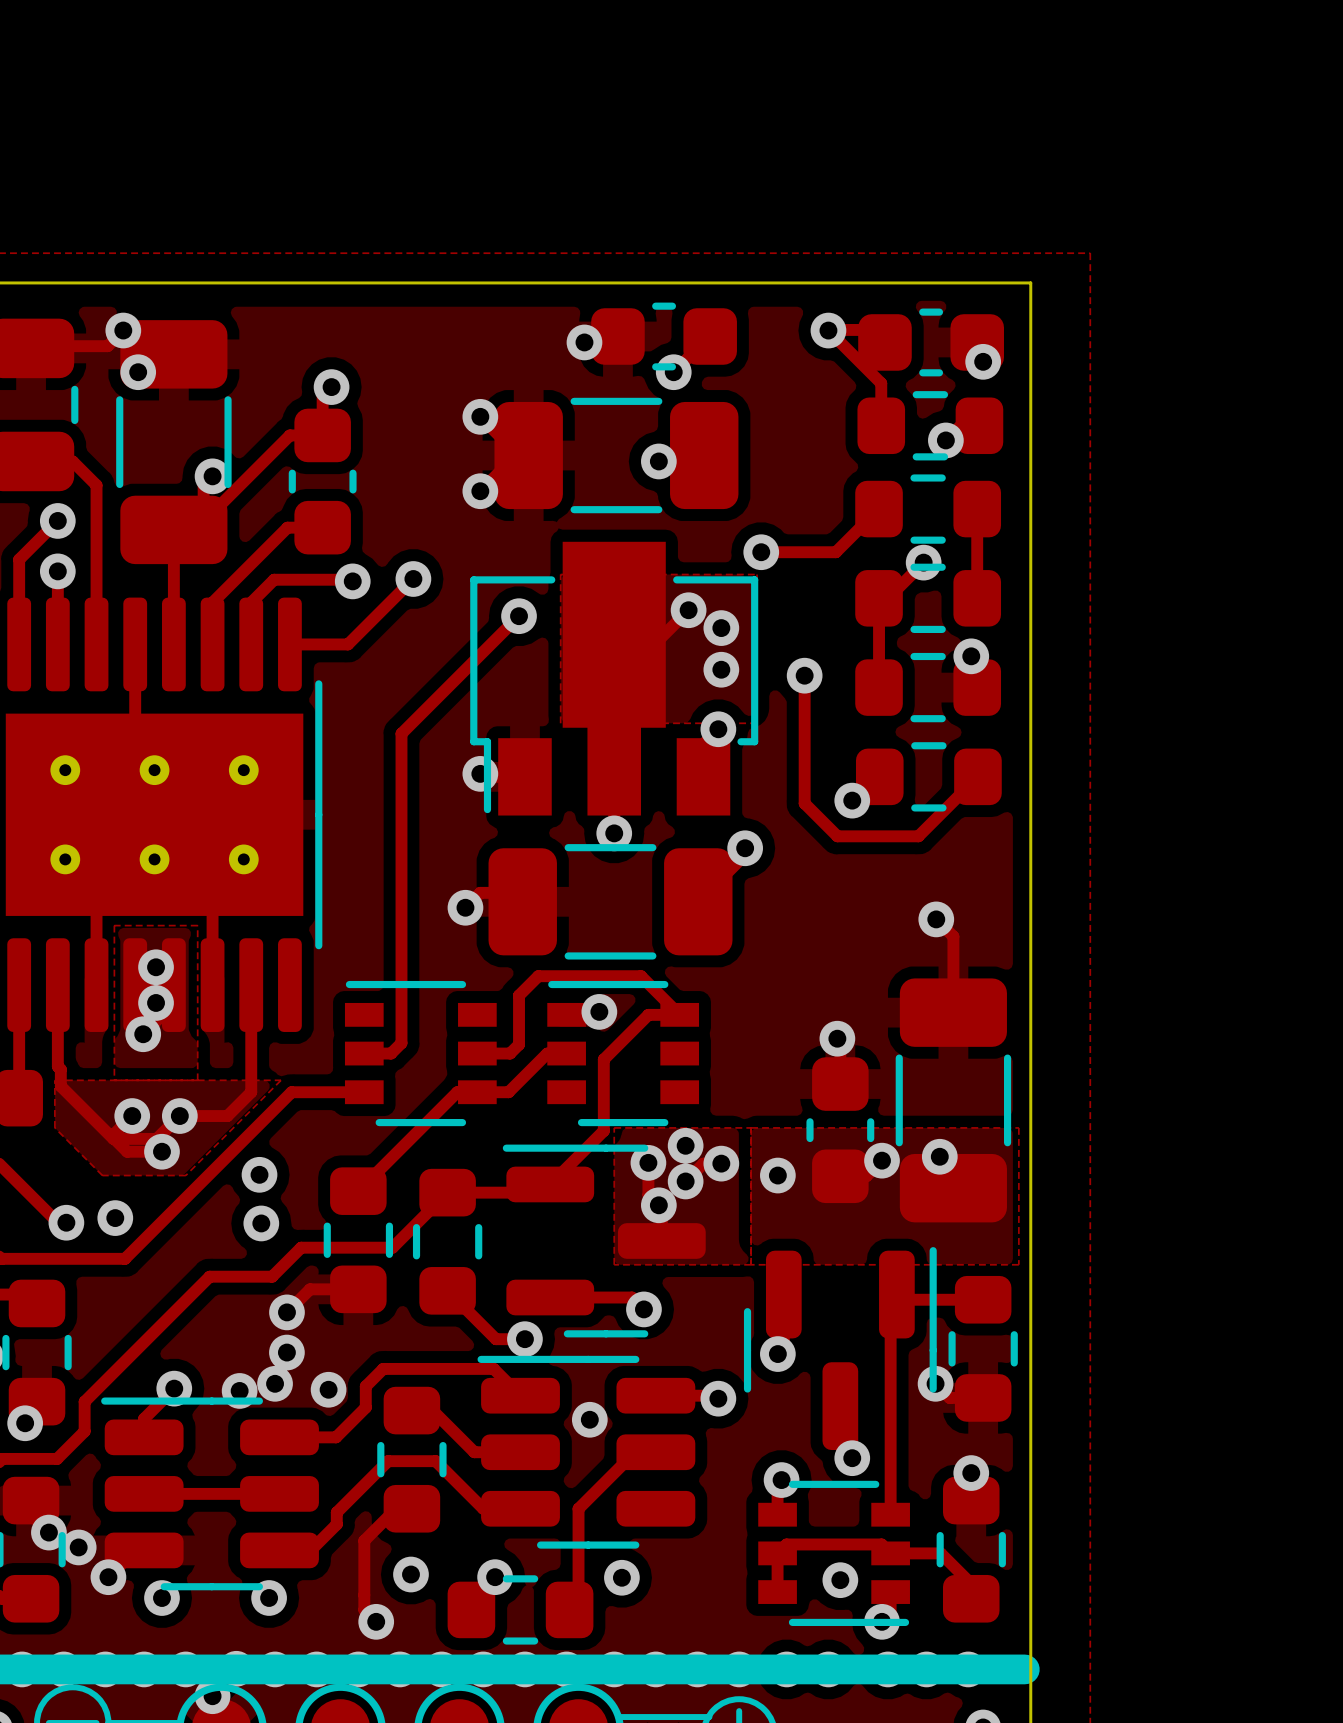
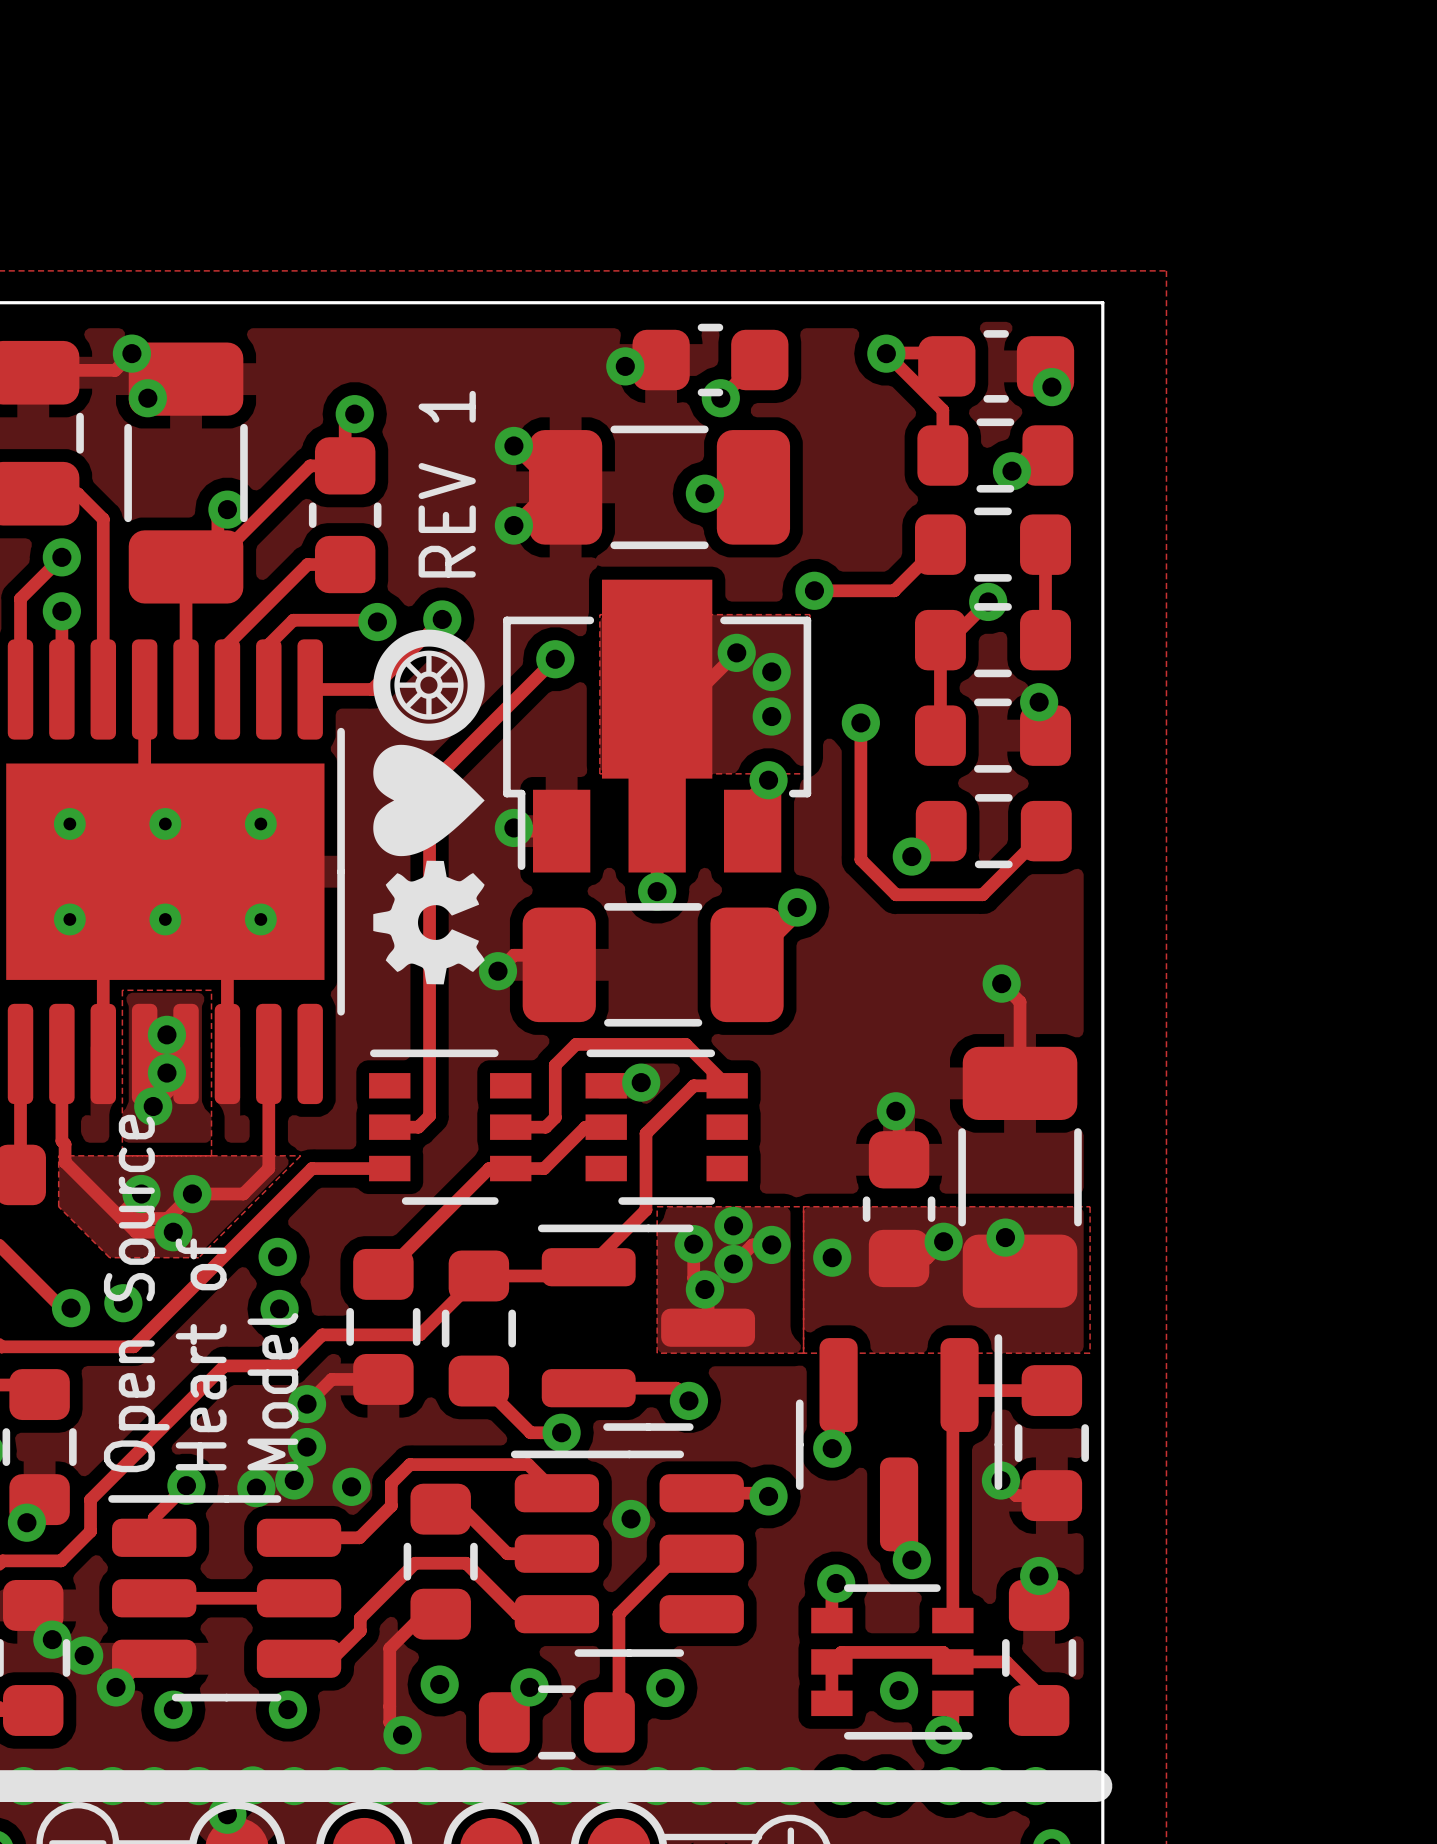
text: none -> REV 1 (447, 484)
drawing: none -> [373, 629, 485, 985]
text: none -> Open Source (136, 1293)
text: none -> Heart of (201, 1354)
text: none -> Model (272, 1391)

